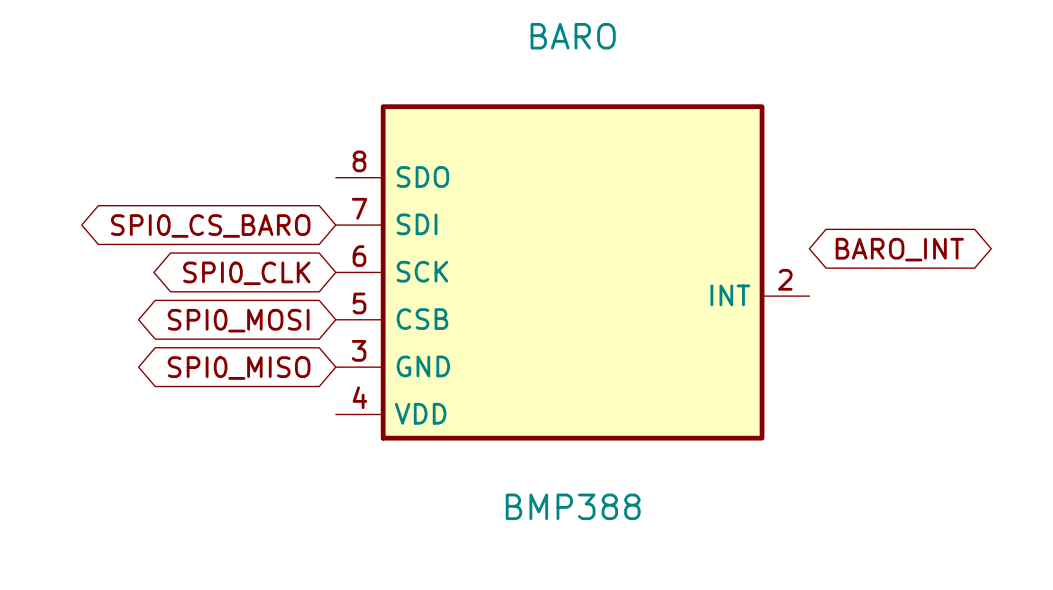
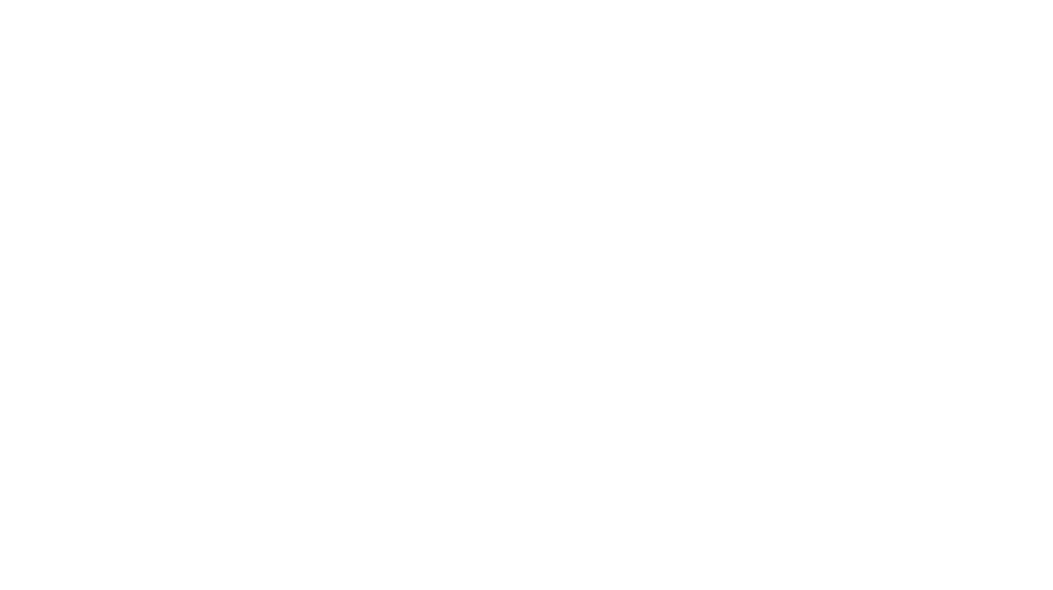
global label: SPI0_CS_BARO (210, 225) -> none
global label: BARO_INT (899, 249) -> none
BARO: BMP388 (572, 272) -> none
global label: SPI0_CLK (246, 273) -> none
global label: SPI0_MOSI (238, 320) -> none
global label: SPI0_MISO (239, 368) -> none

